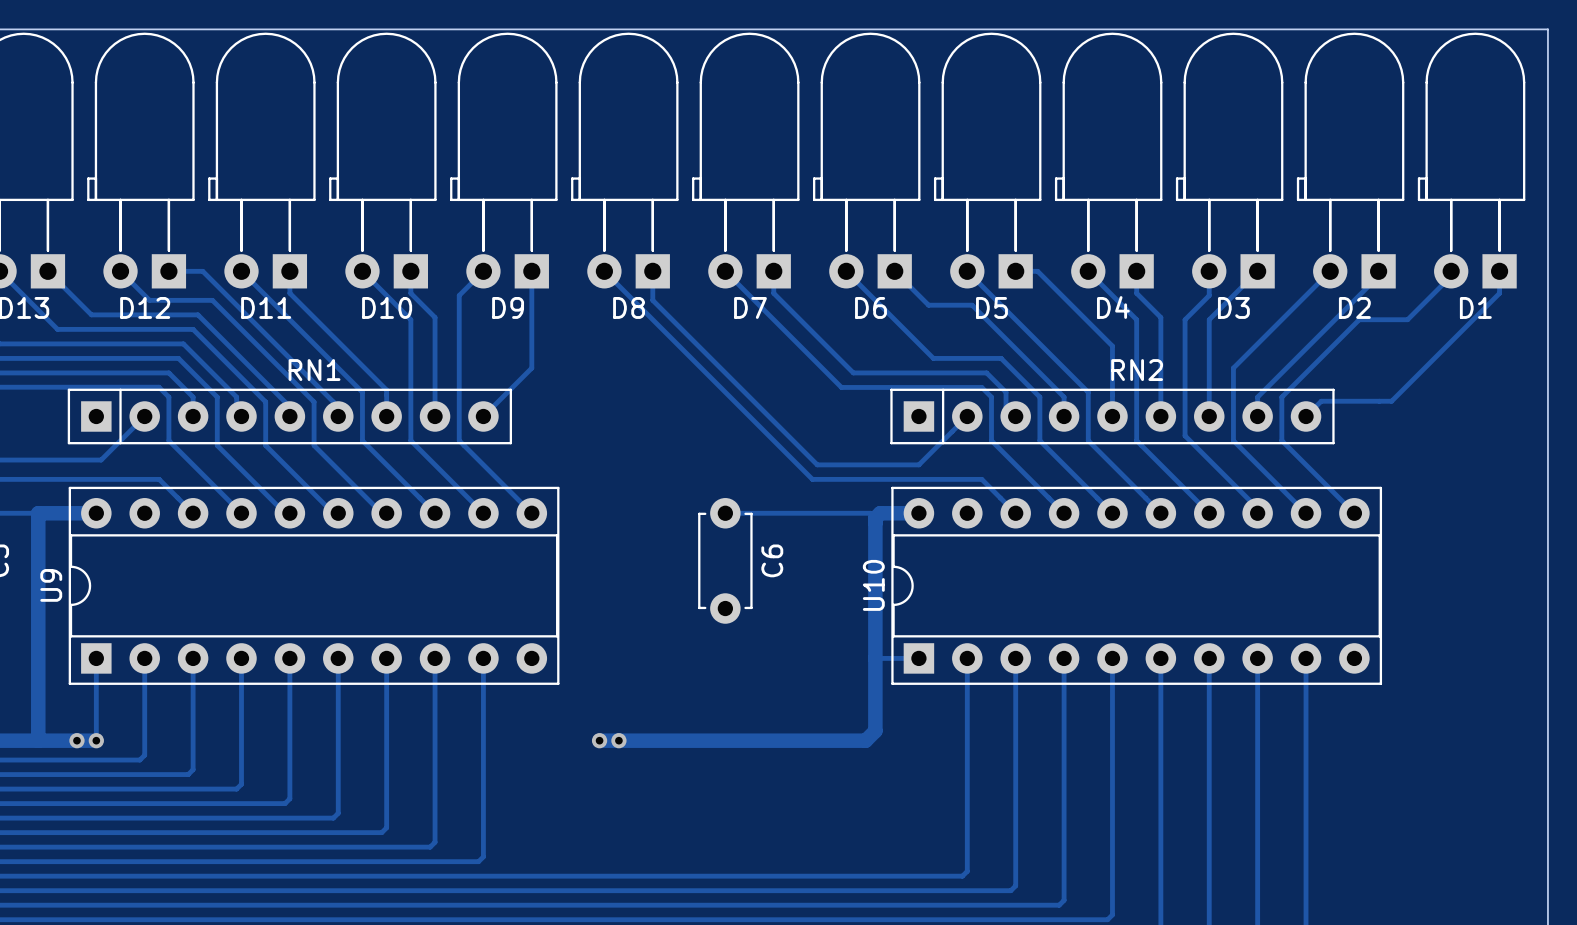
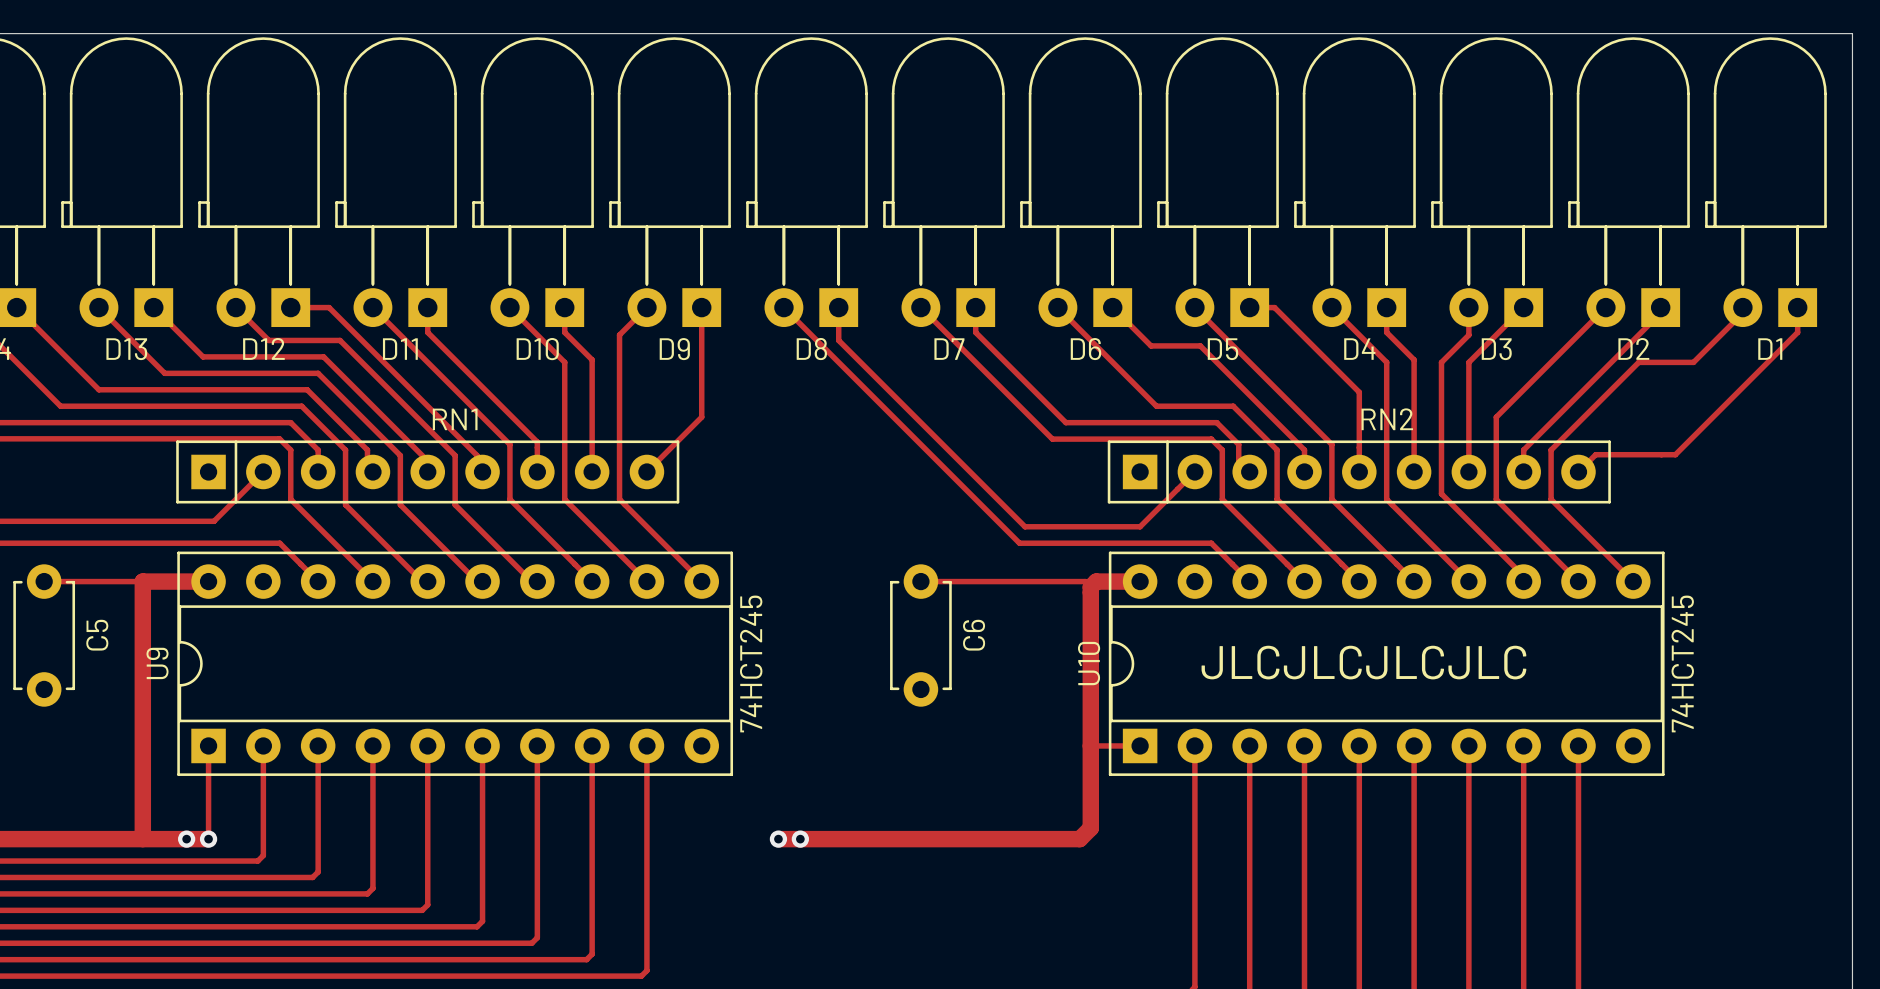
text: none -> JLCJLCJLCJLC (1363, 662)
U9 value: none -> 74HCT245 (751, 663)
U10 value: none -> 74HCT245 (1682, 663)

